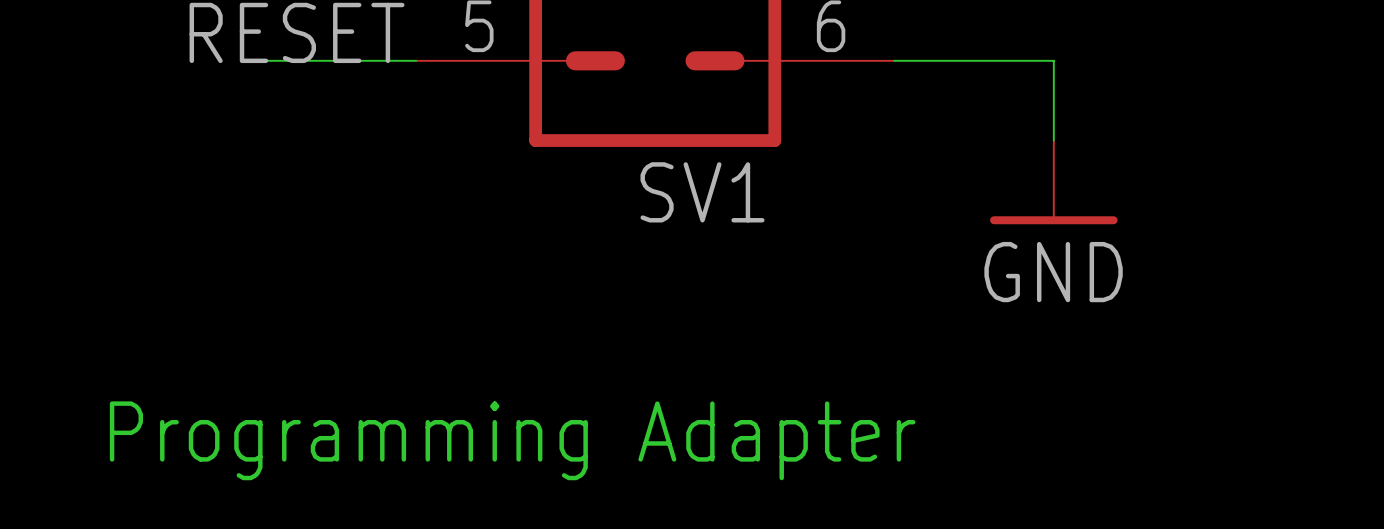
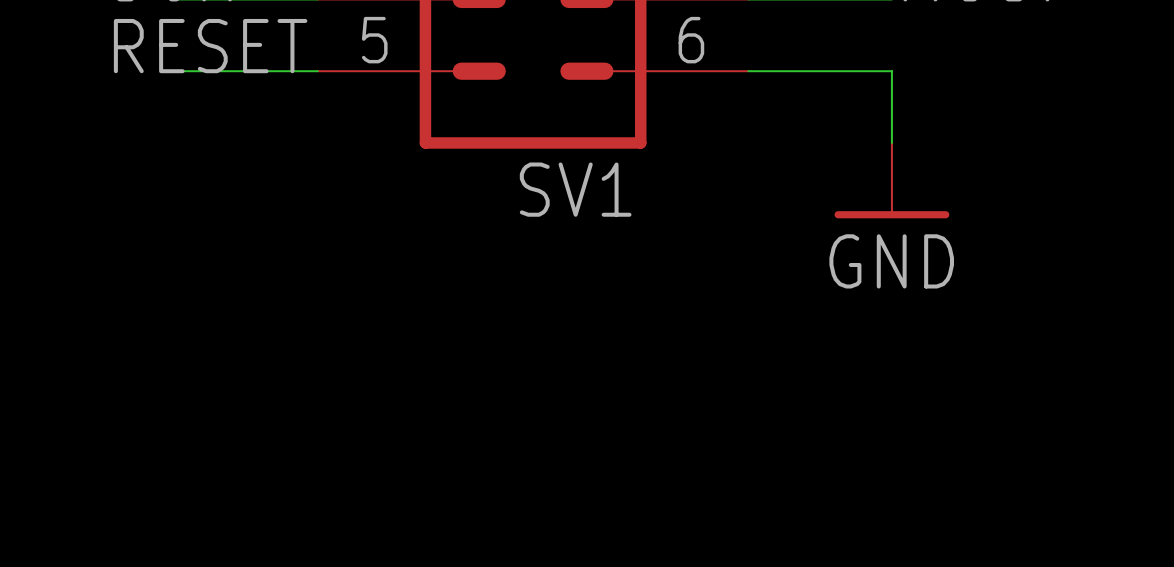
text: Programming Adapter (512, 440) -> none

